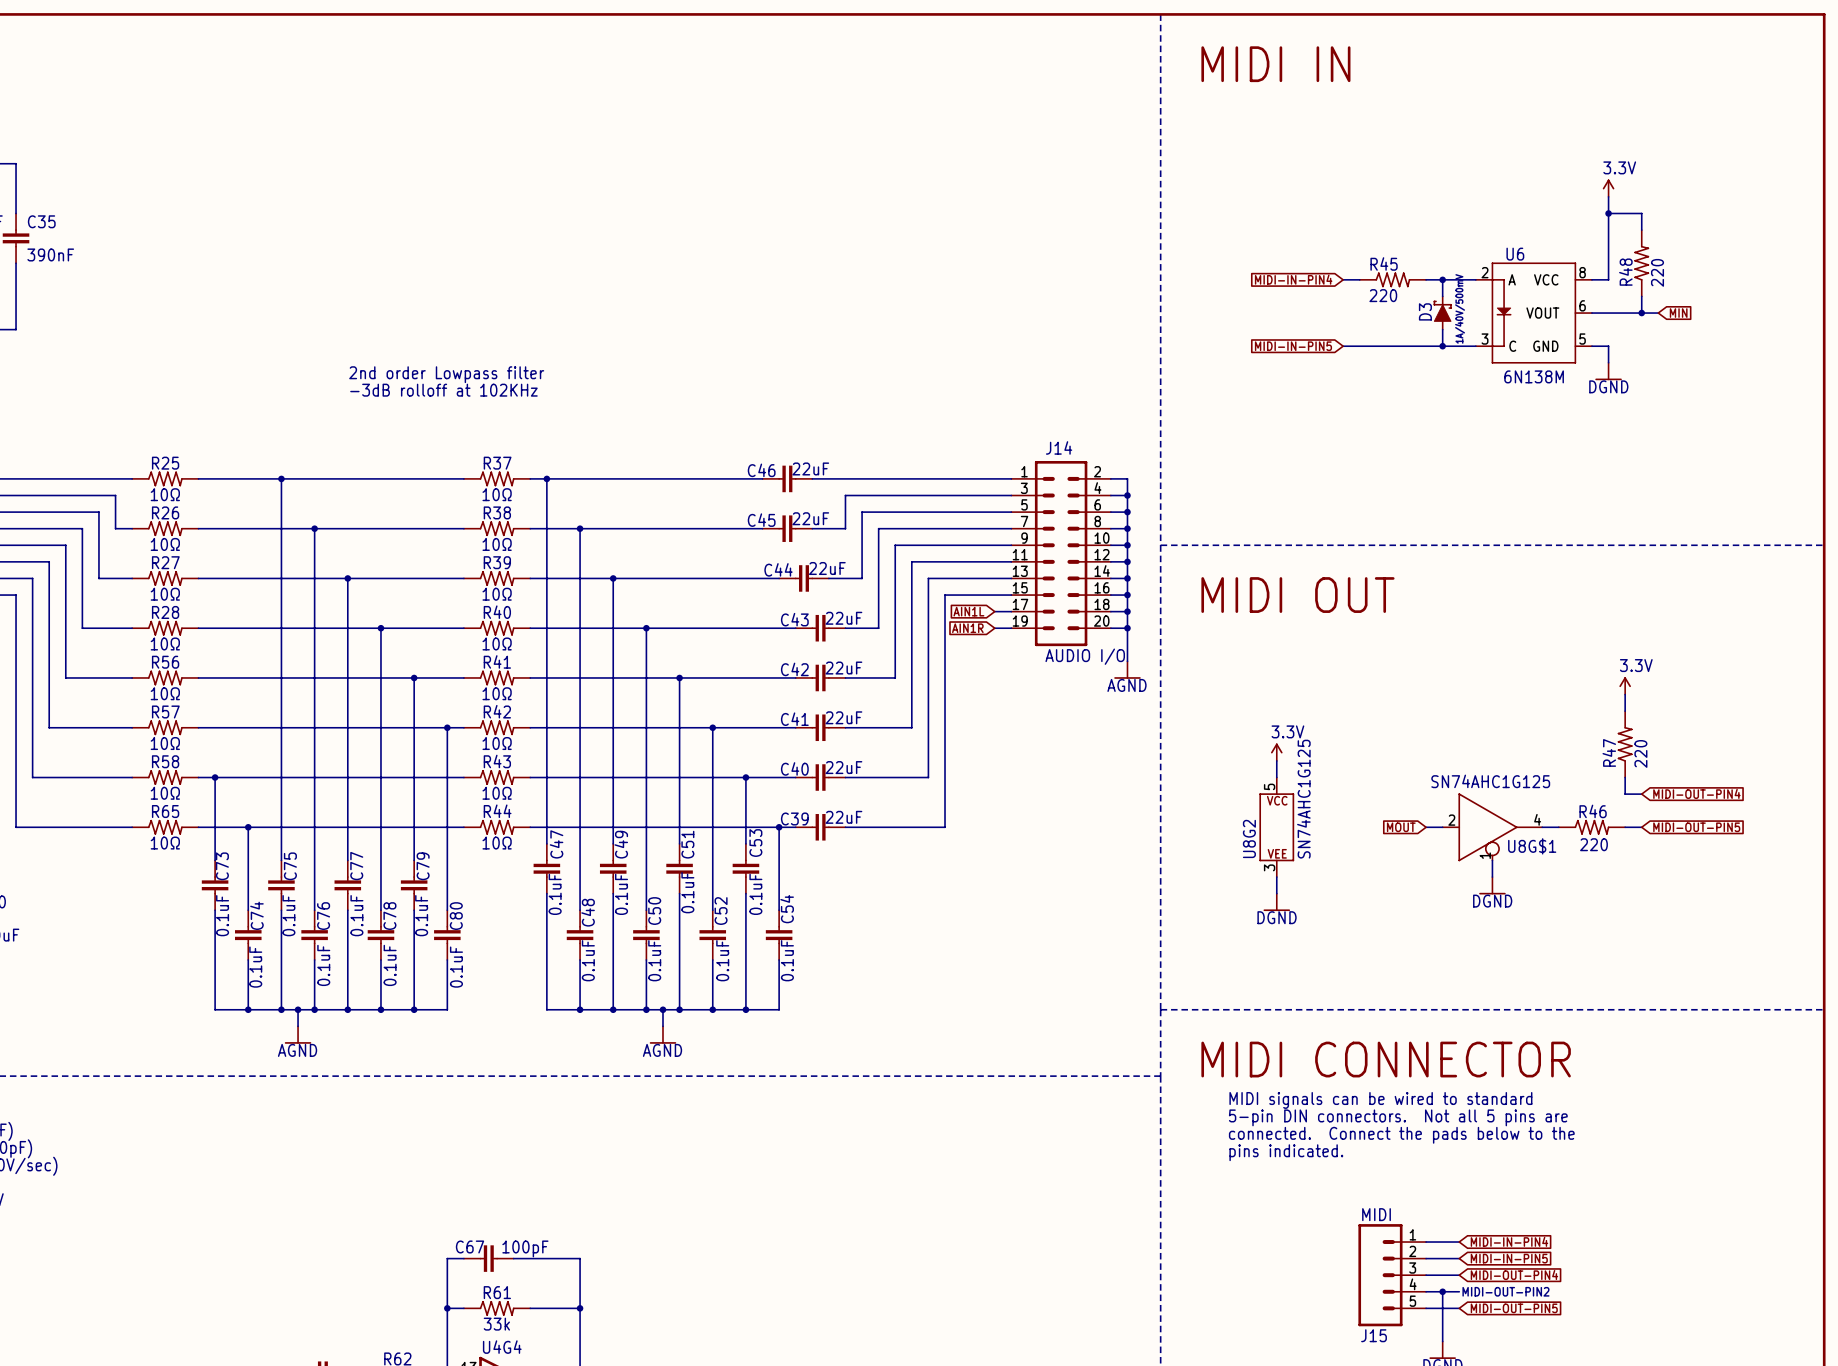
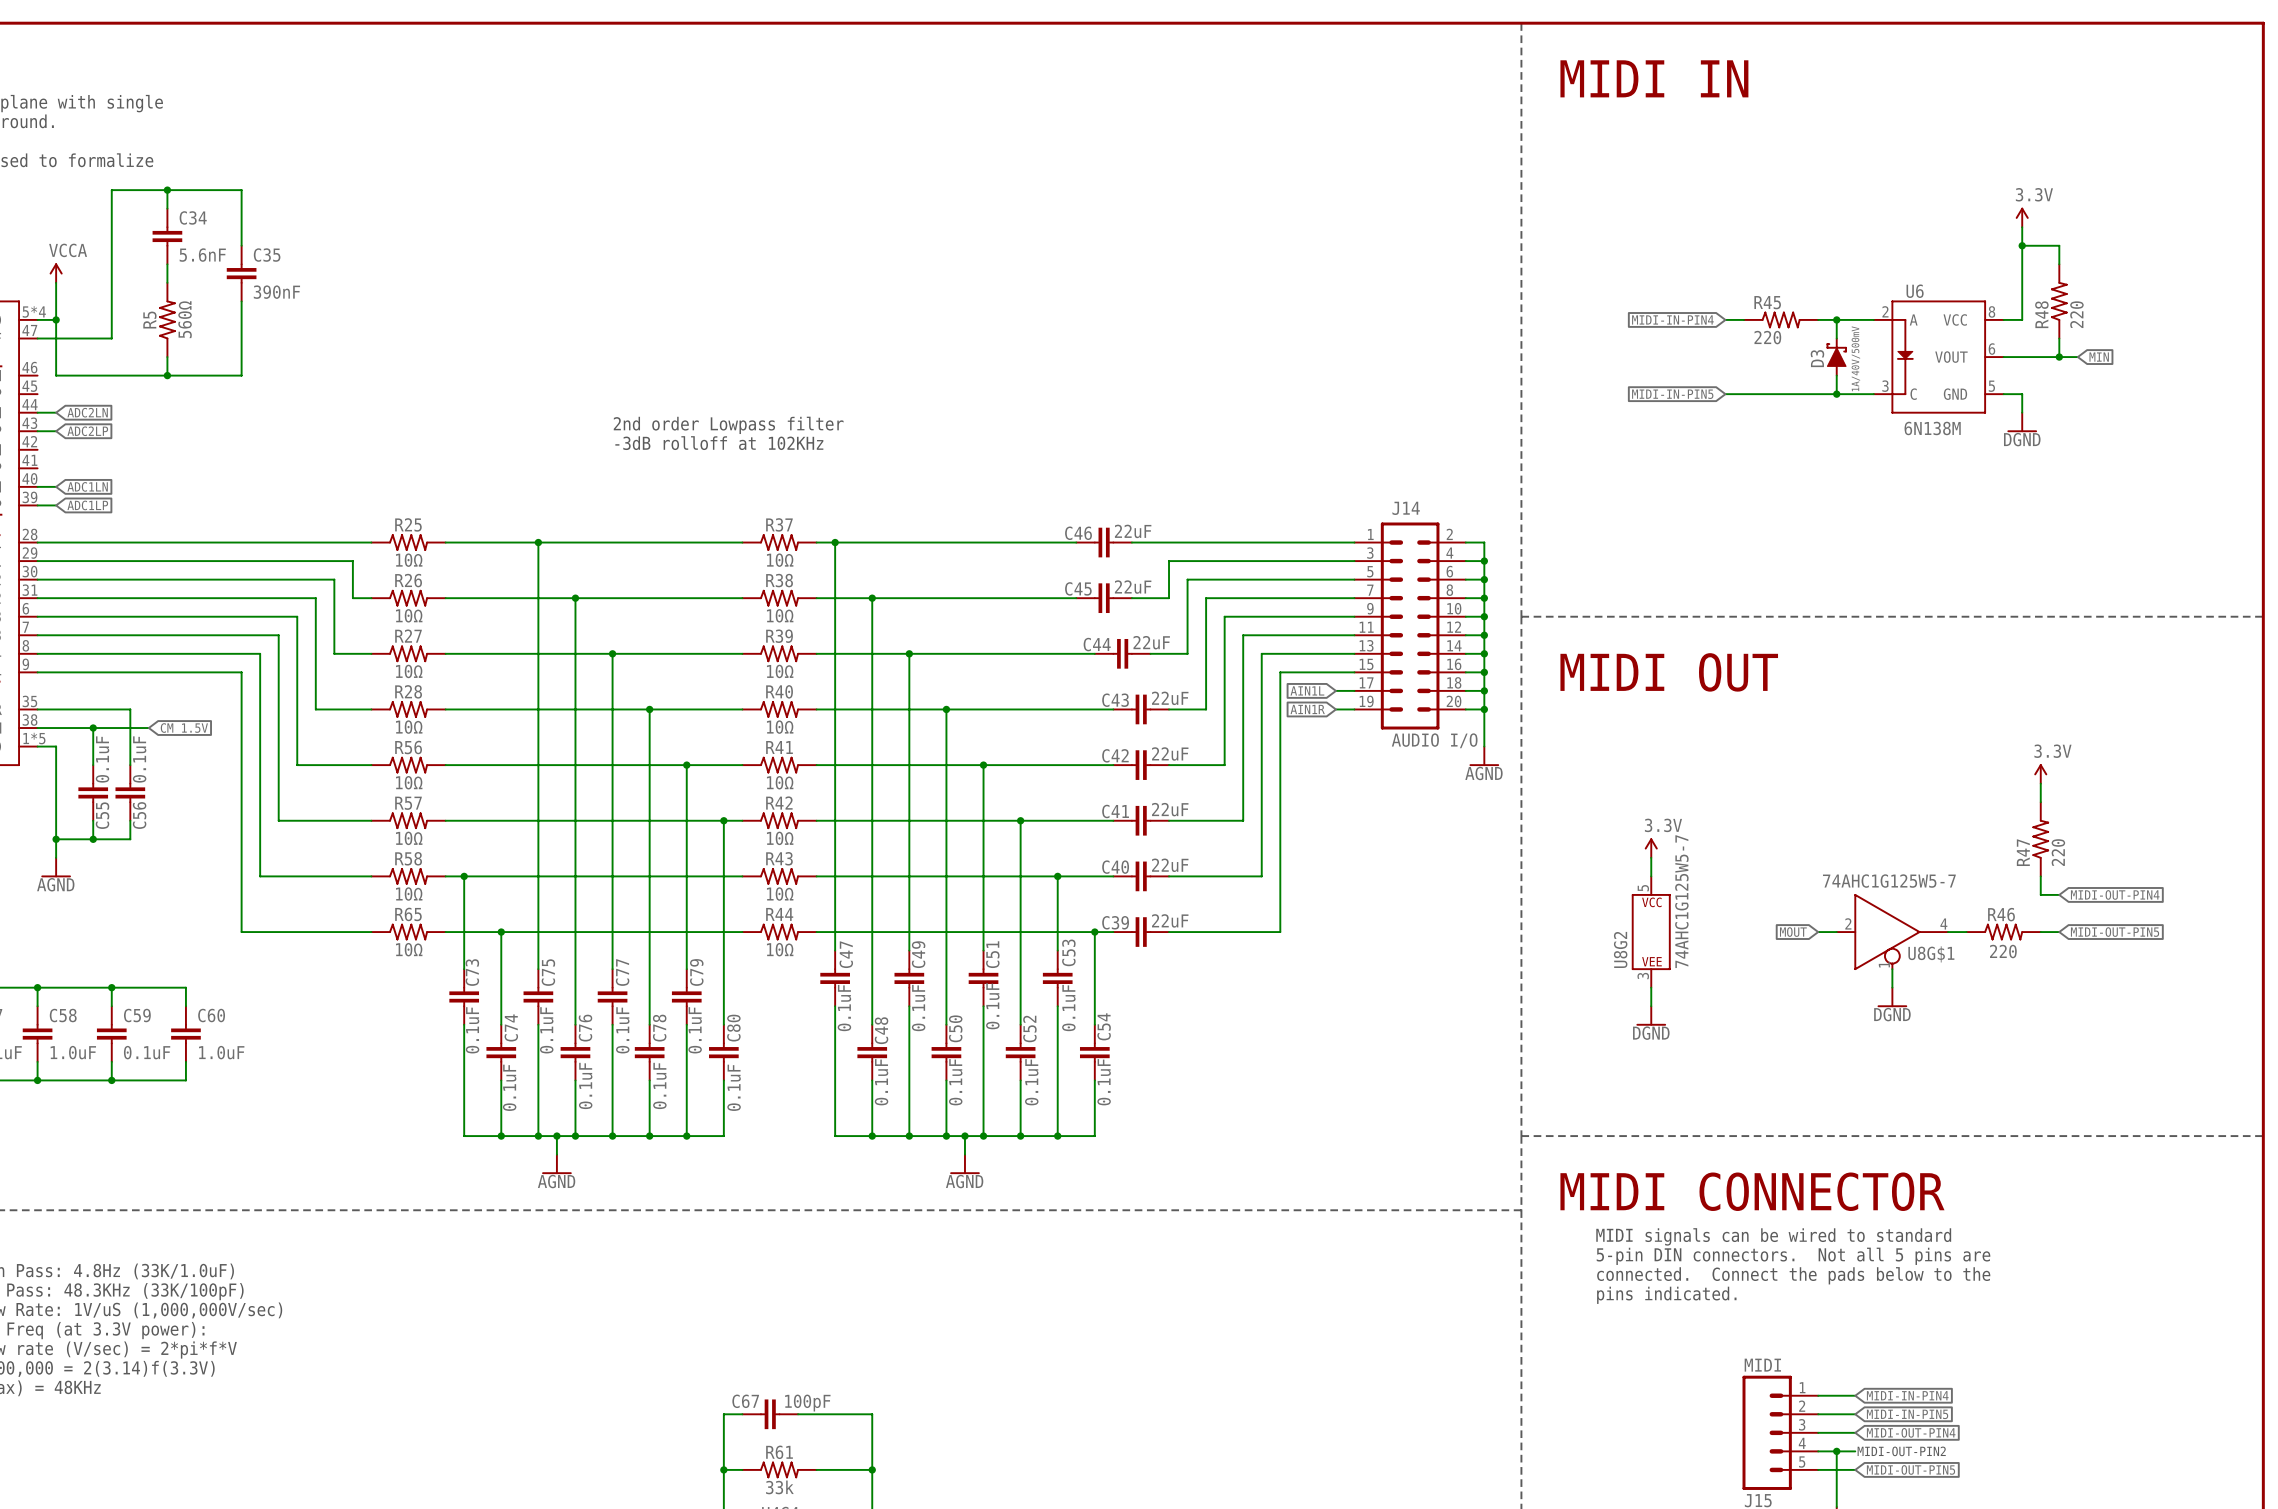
U8G$1 value: SN74AHC1G125 (1490, 781) -> 74AHC1G125W5-7 (1889, 881)
U8G2 value: SN74AHC1G125 (1303, 799) -> 74AHC1G125W5-7 (1681, 901)

